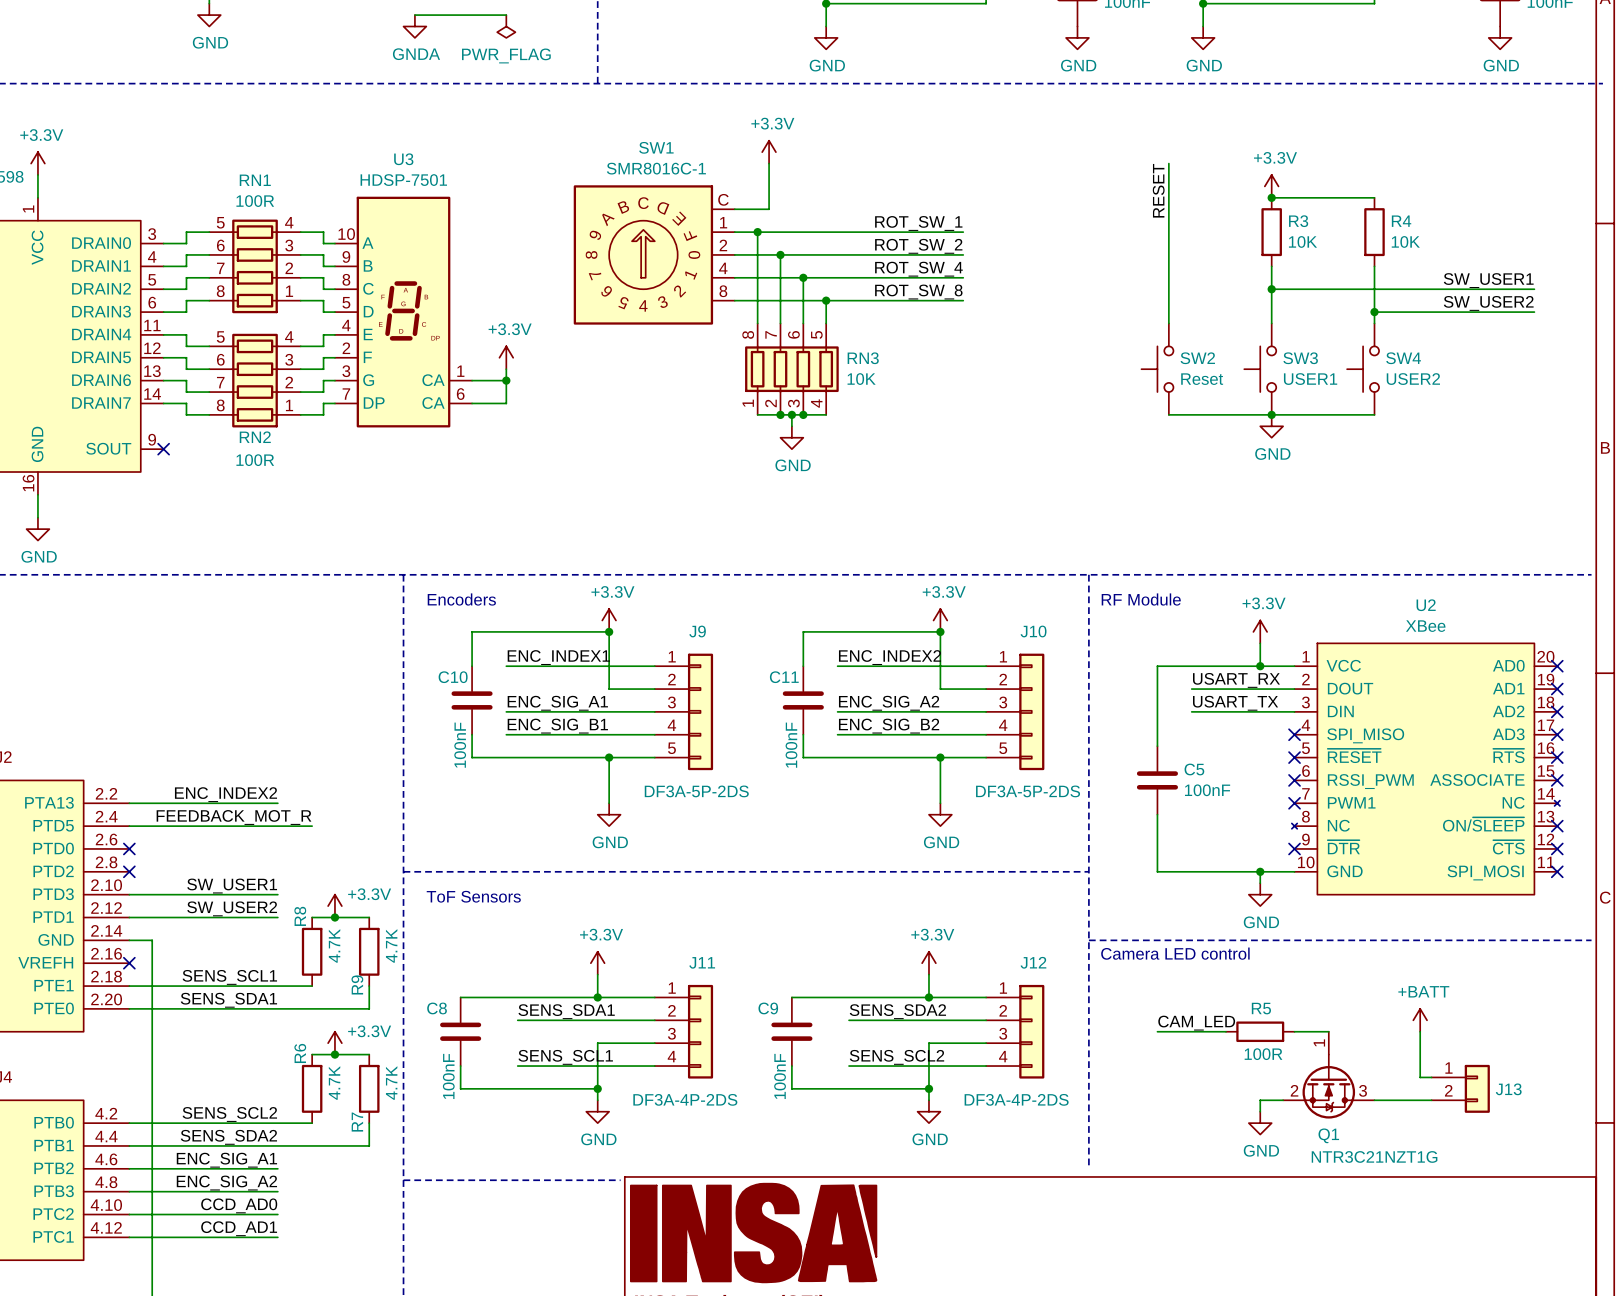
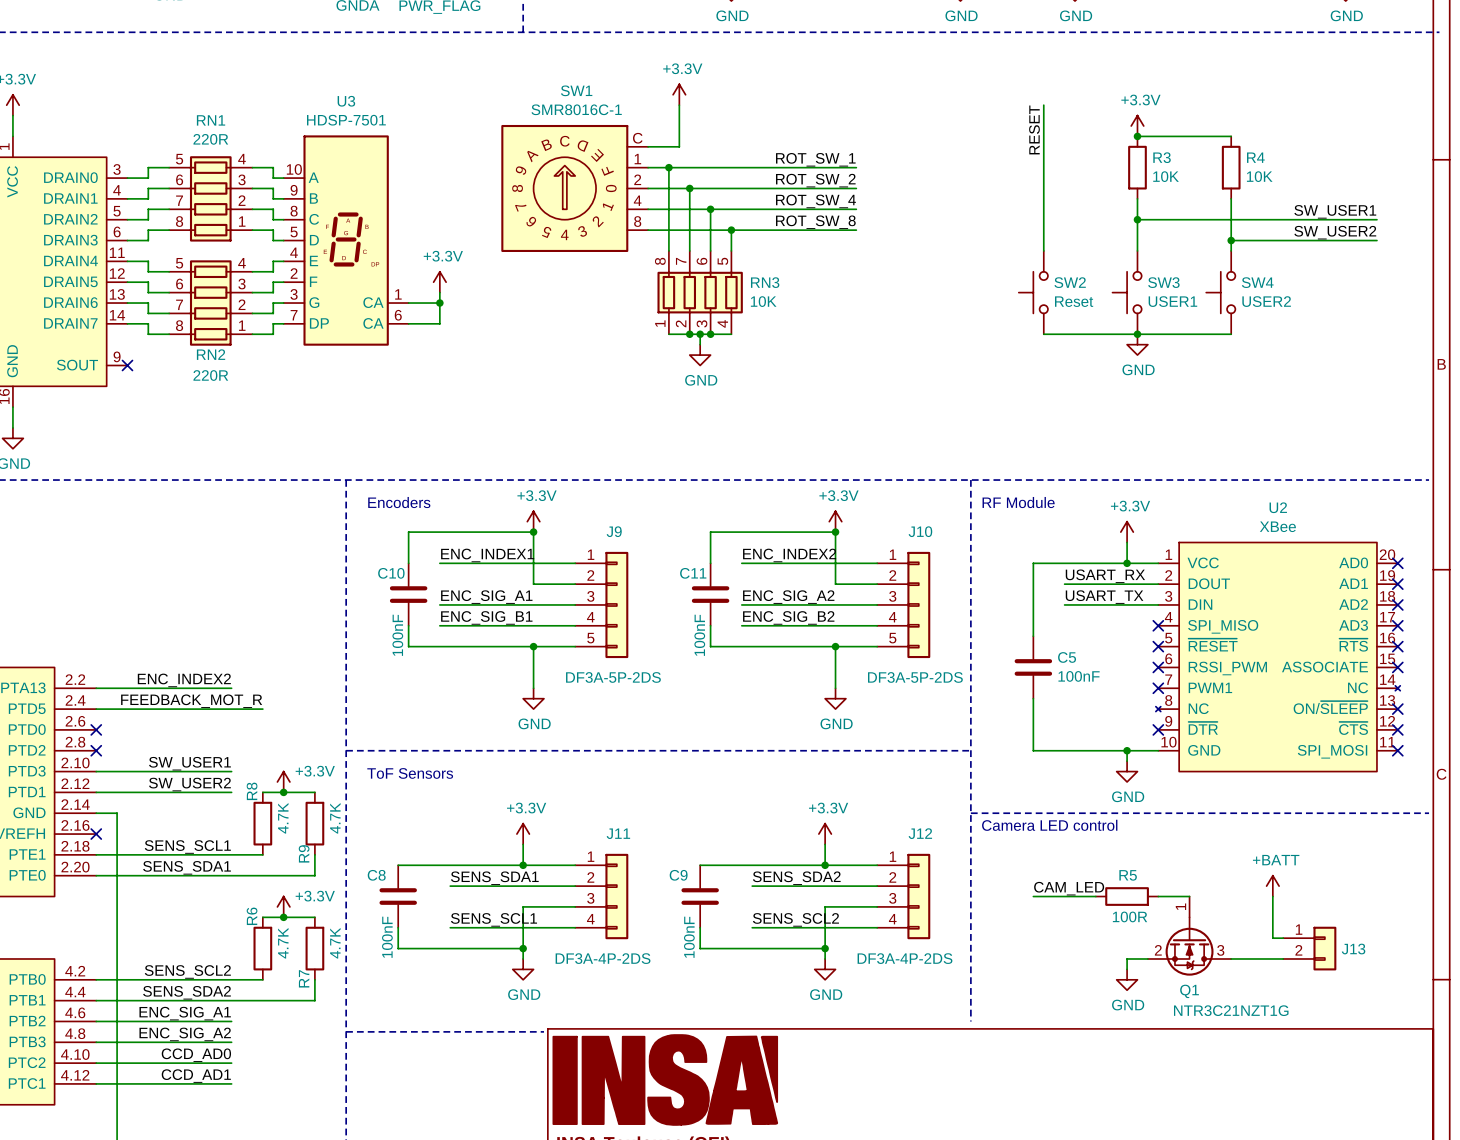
RN1 value: 100R (255, 201) -> 220R (210, 139)
RN2 value: 100R (255, 460) -> 220R (210, 375)

